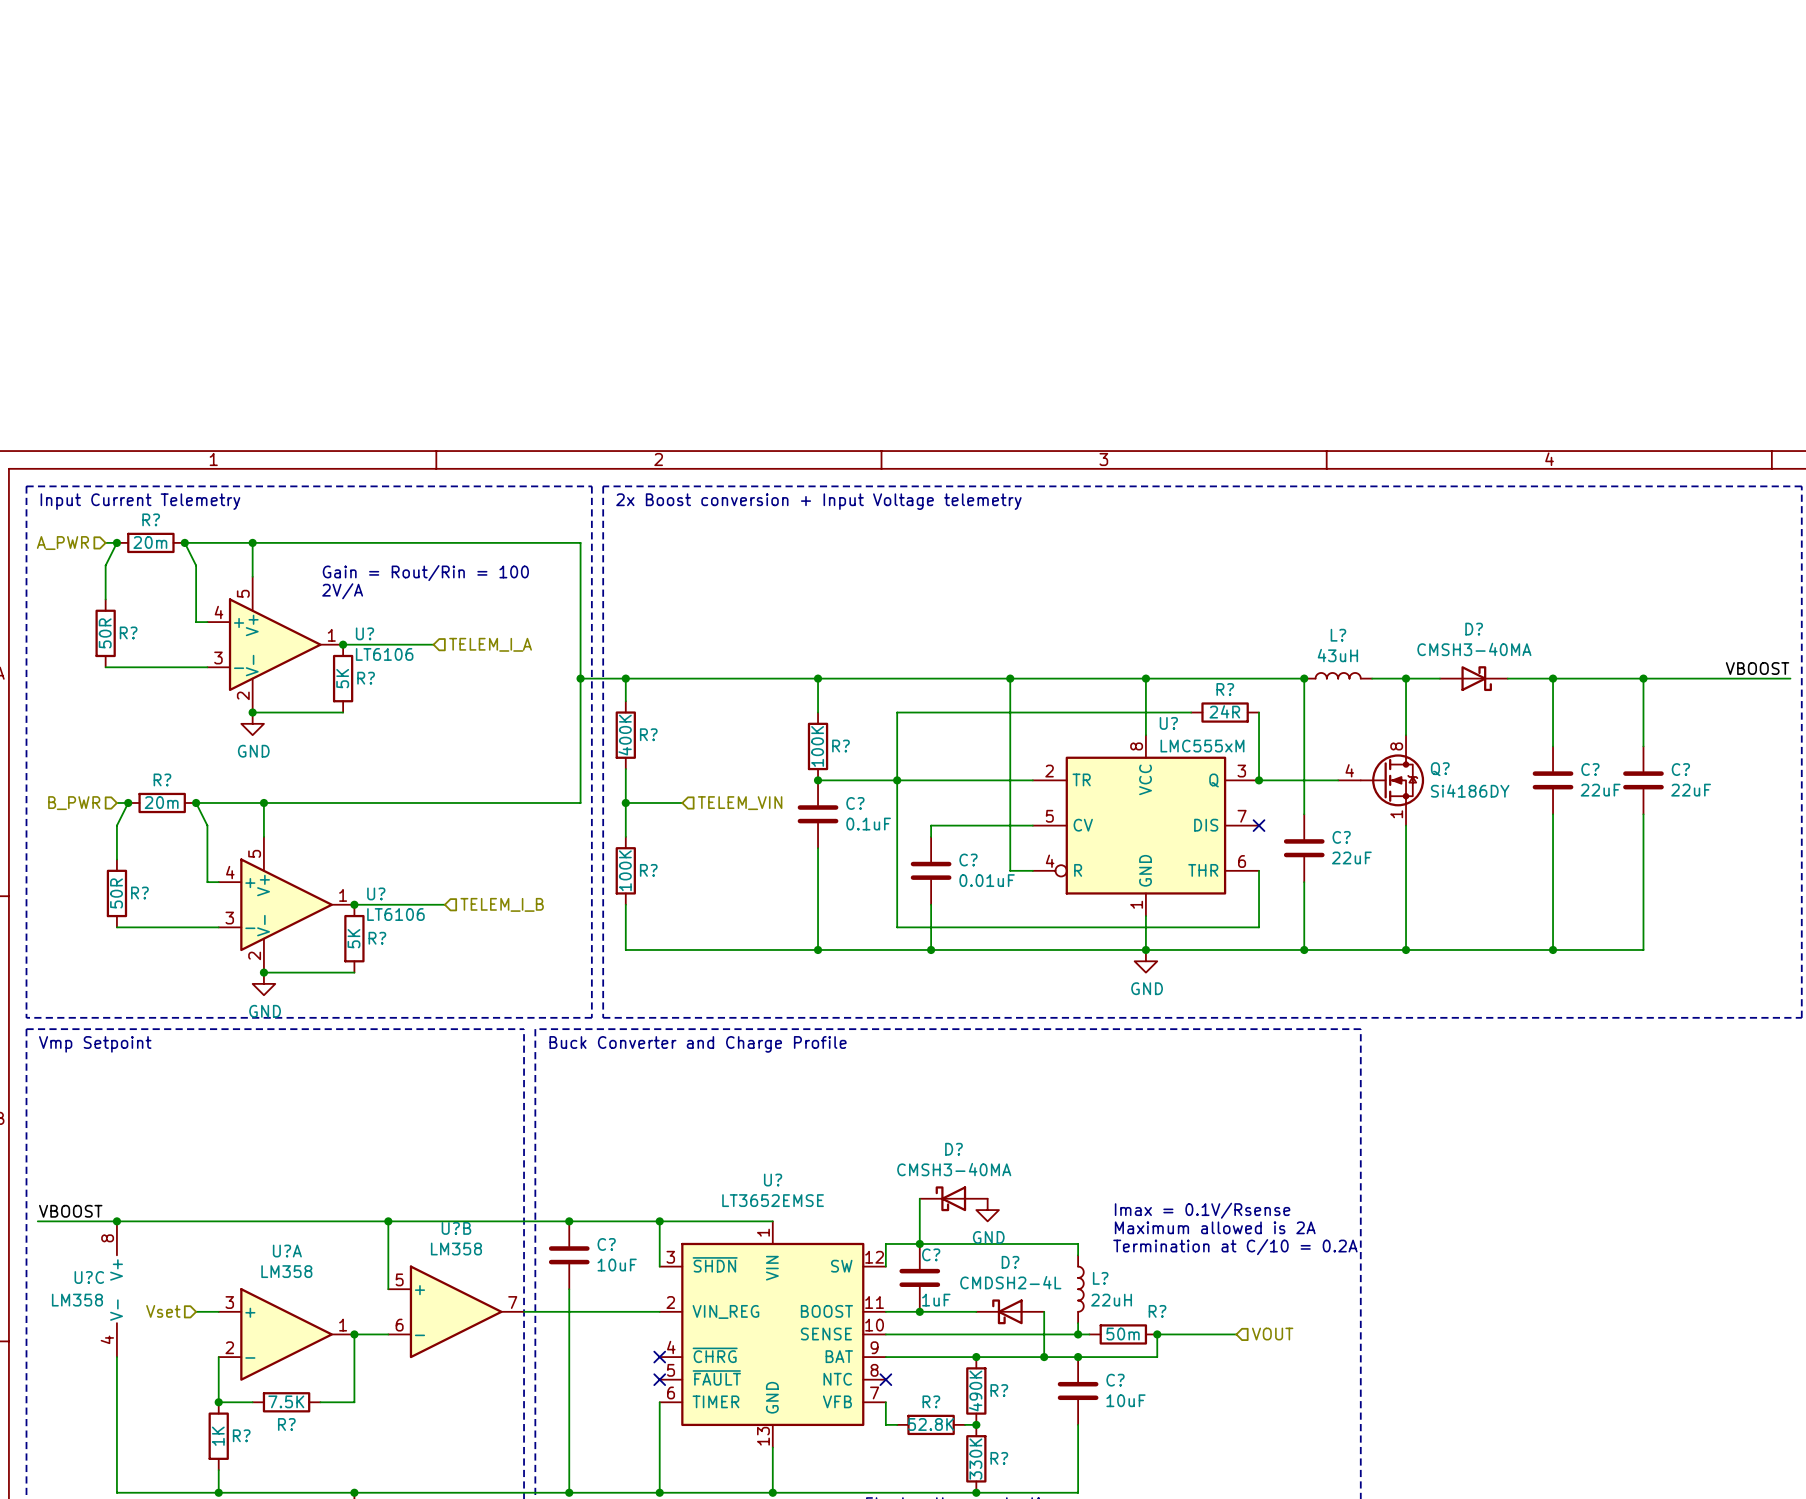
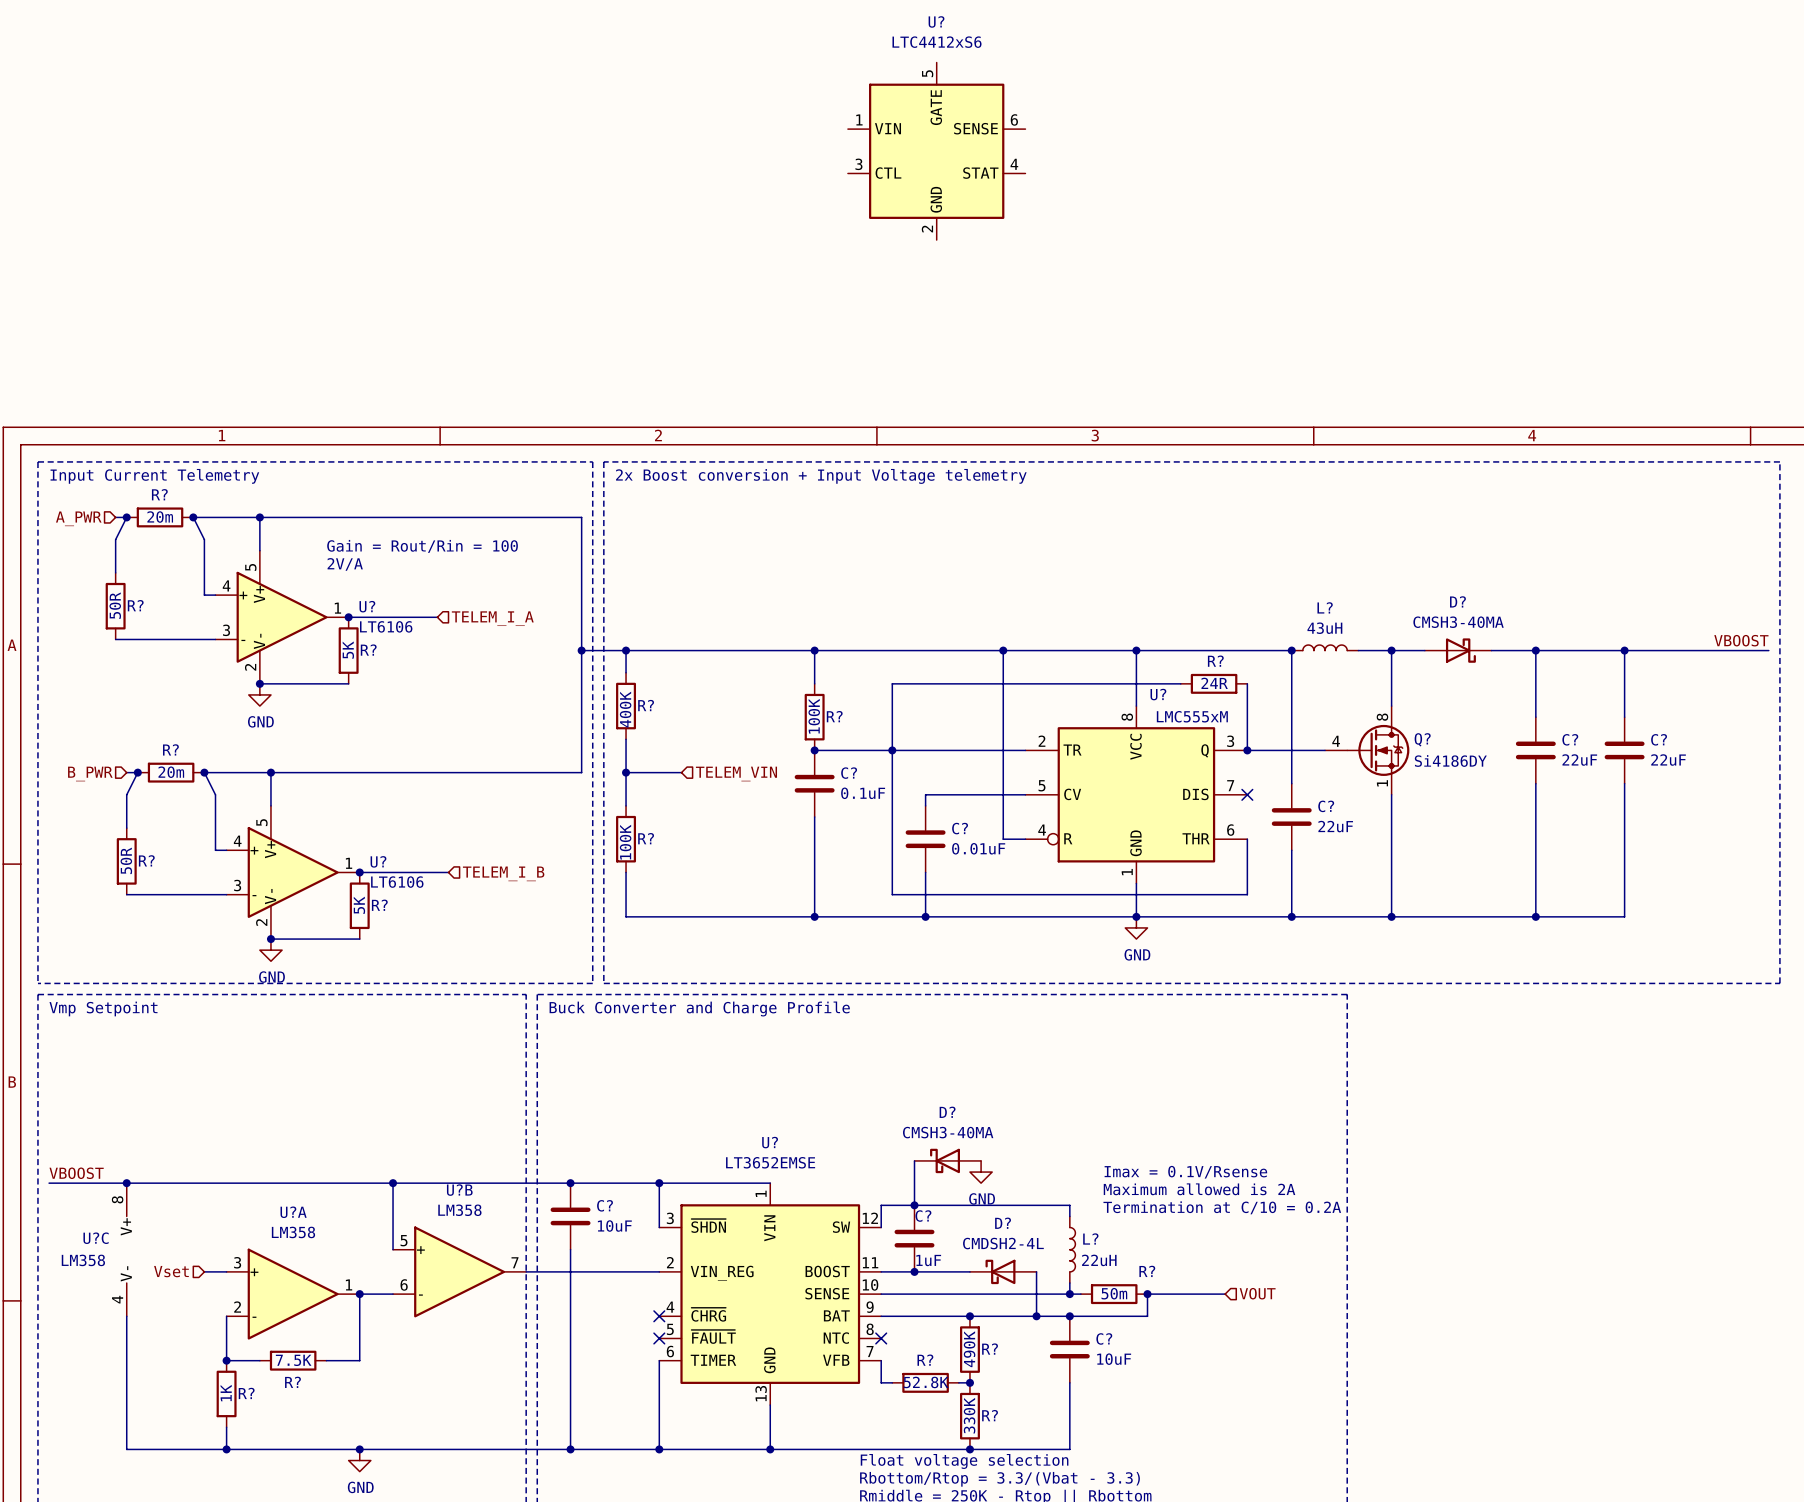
U?: none -> LTC4412xS6 (936, 151)

